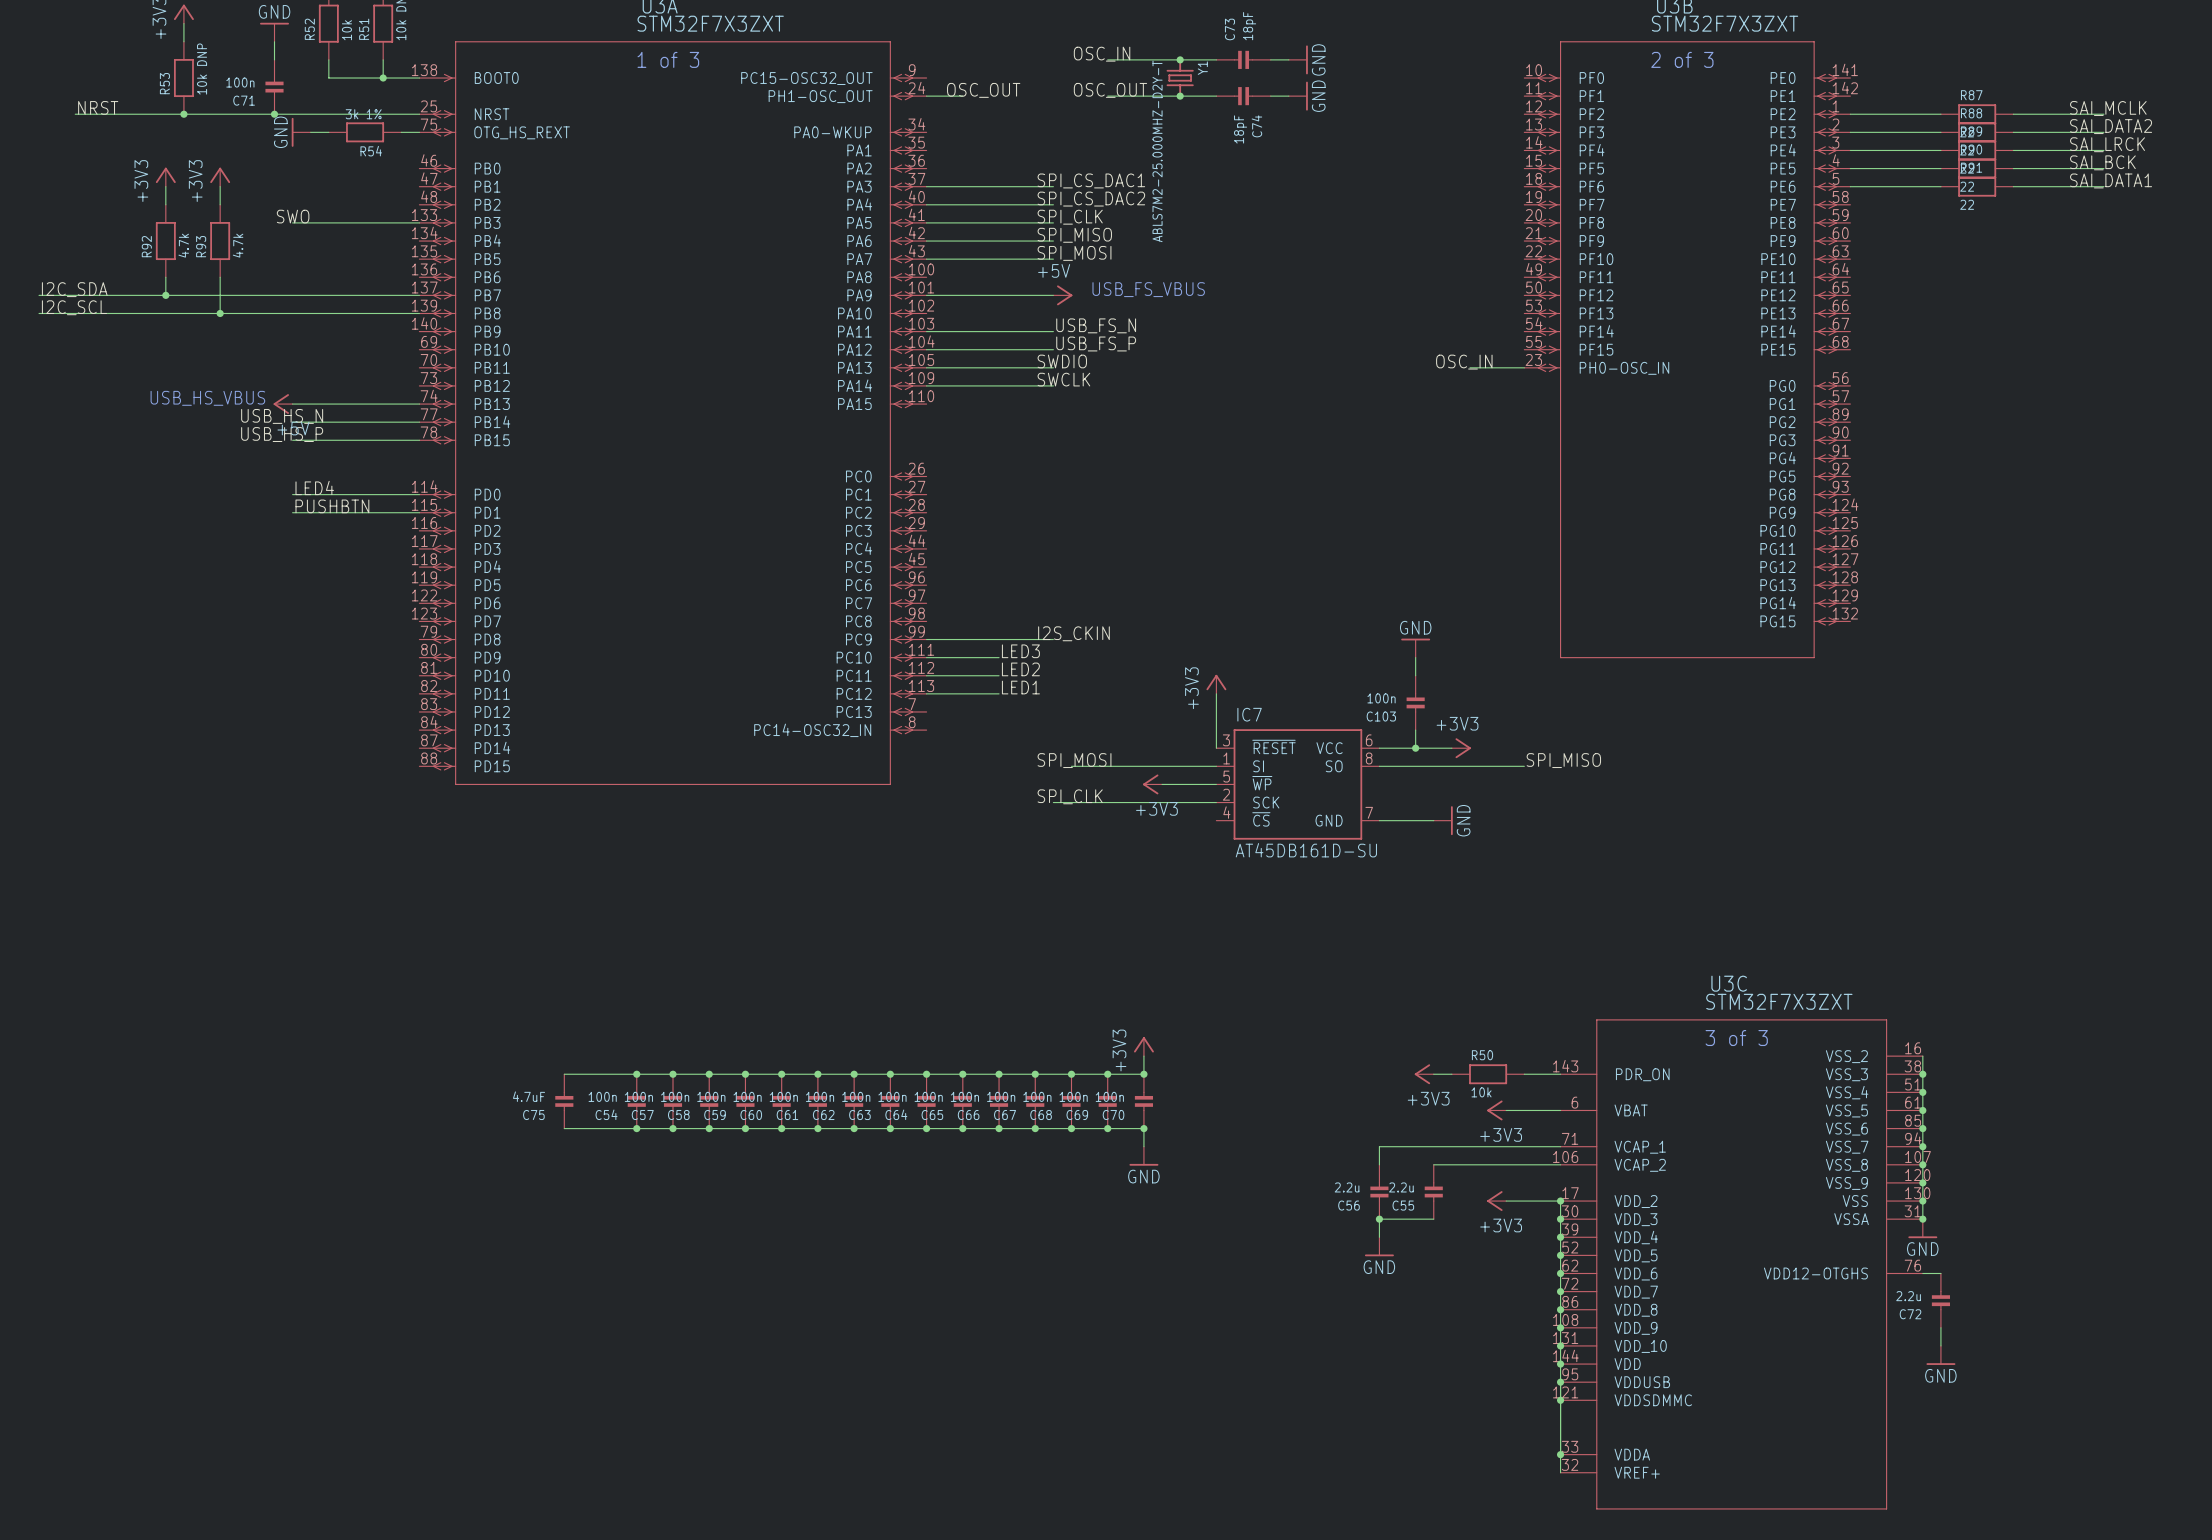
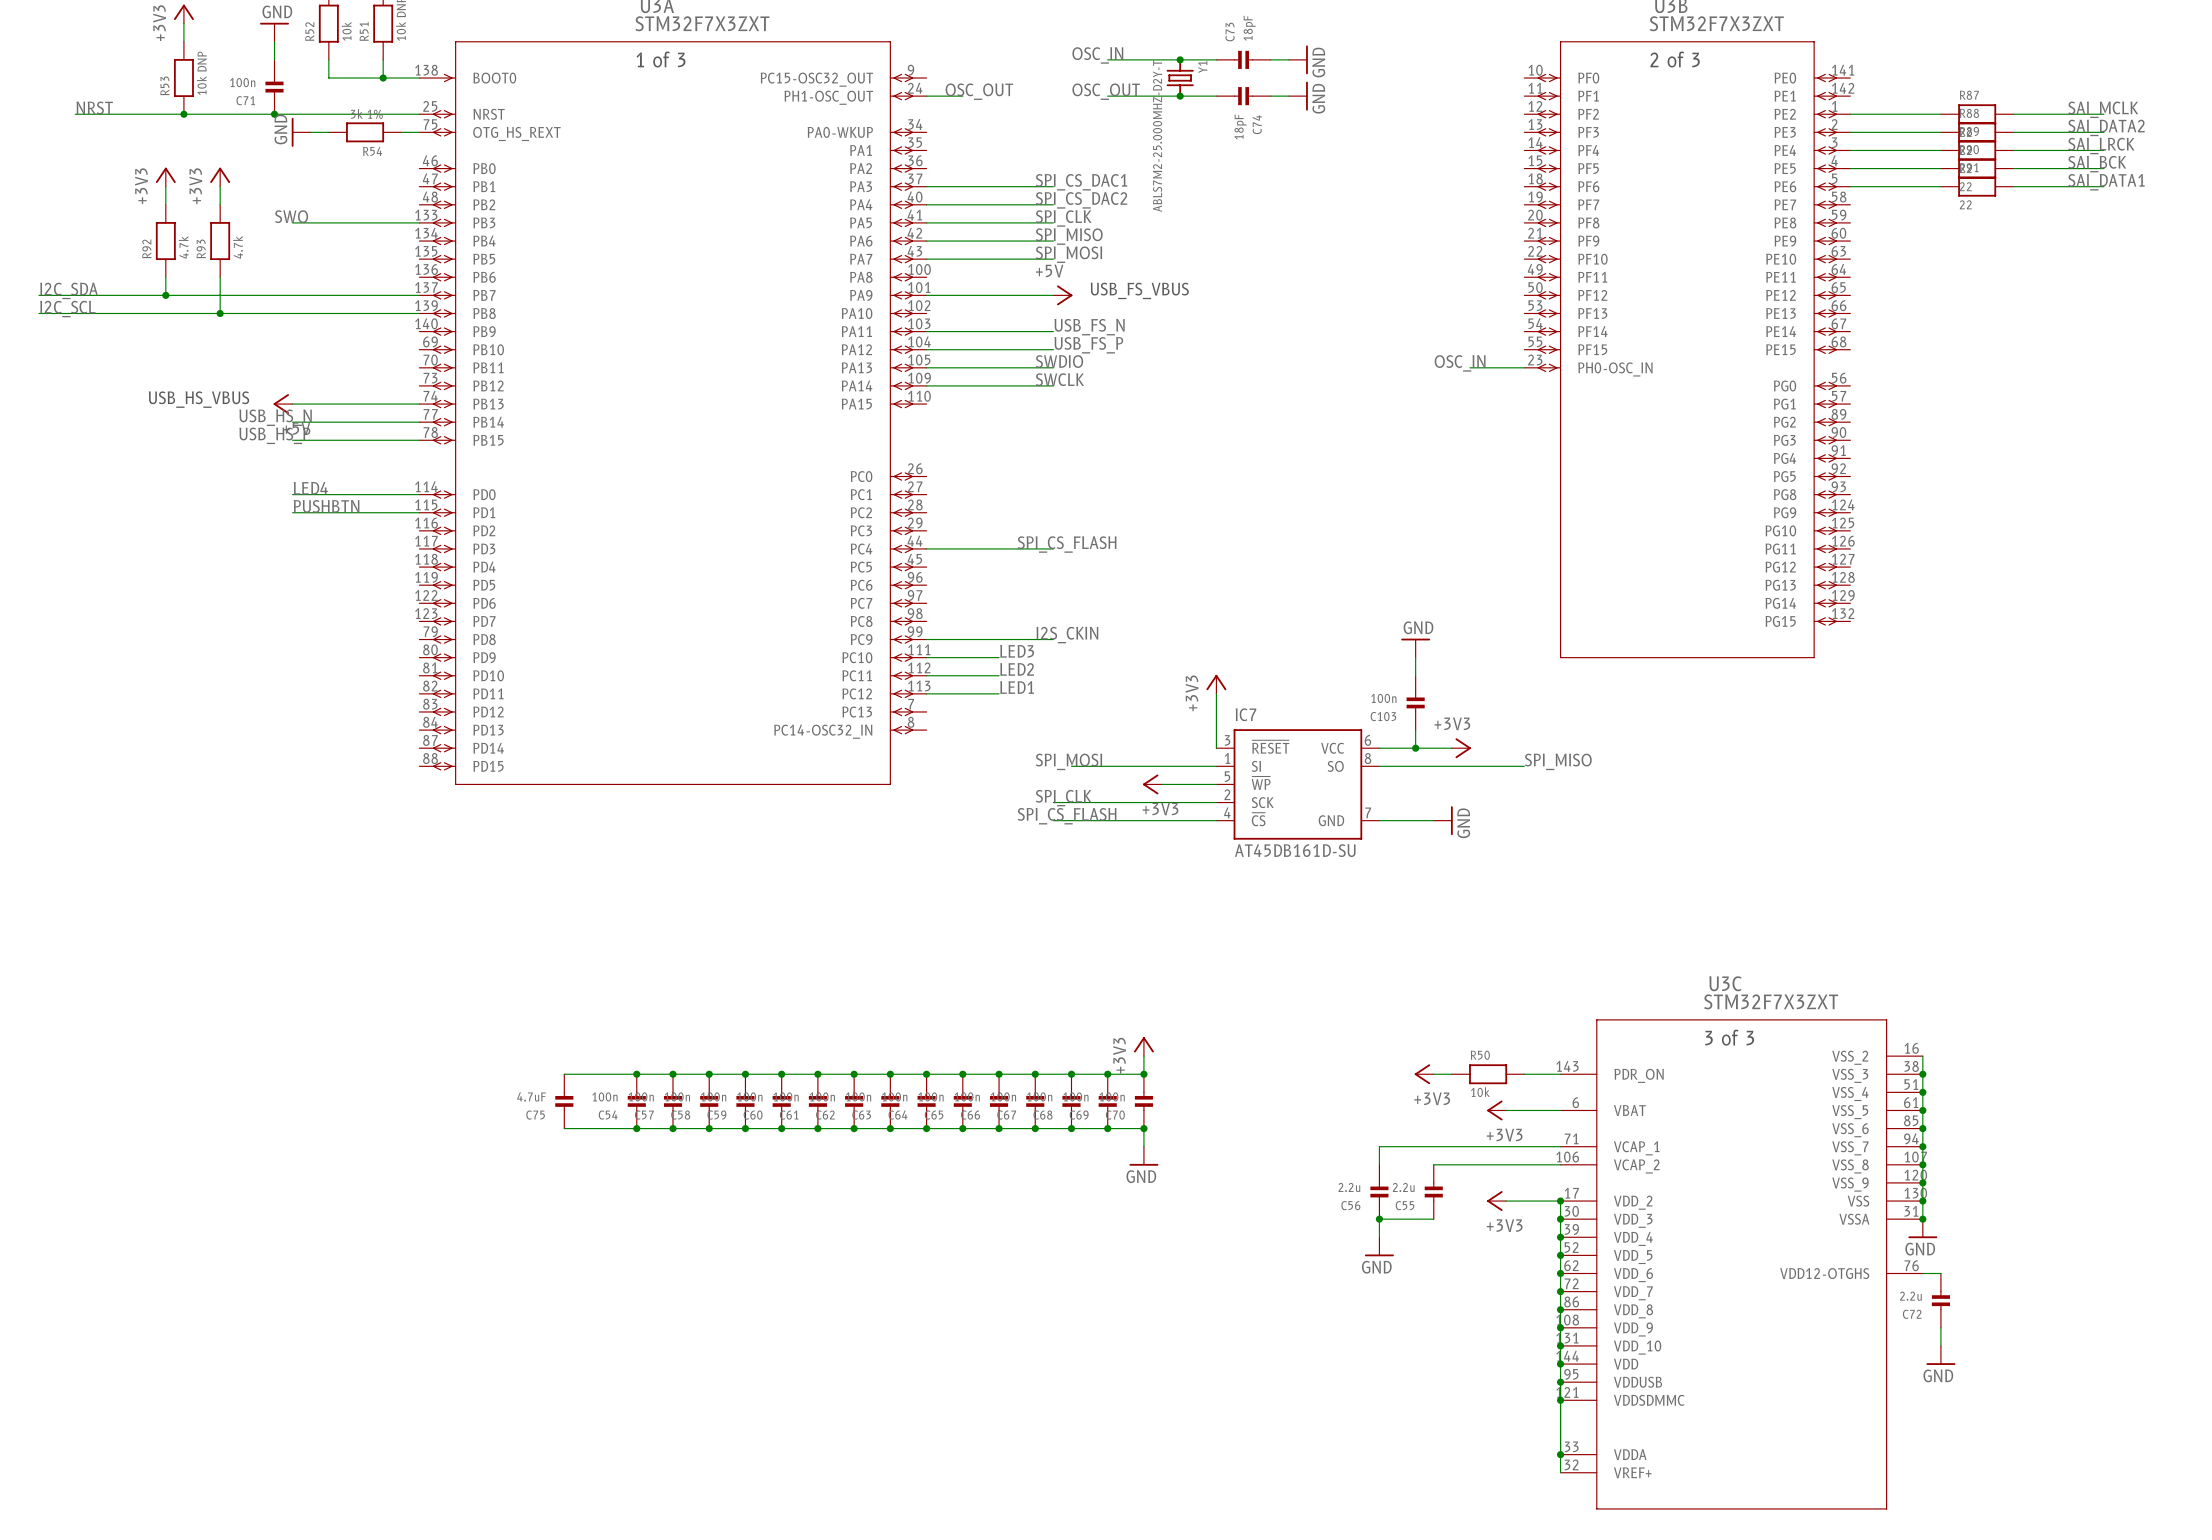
label: none -> SPI_CS_FLASH (1067, 544)
wire: none -> (926, 548) (1053, 548)
label: none -> SPI_CS_FLASH (1067, 816)
wire: none -> (1053, 820) (1216, 820)

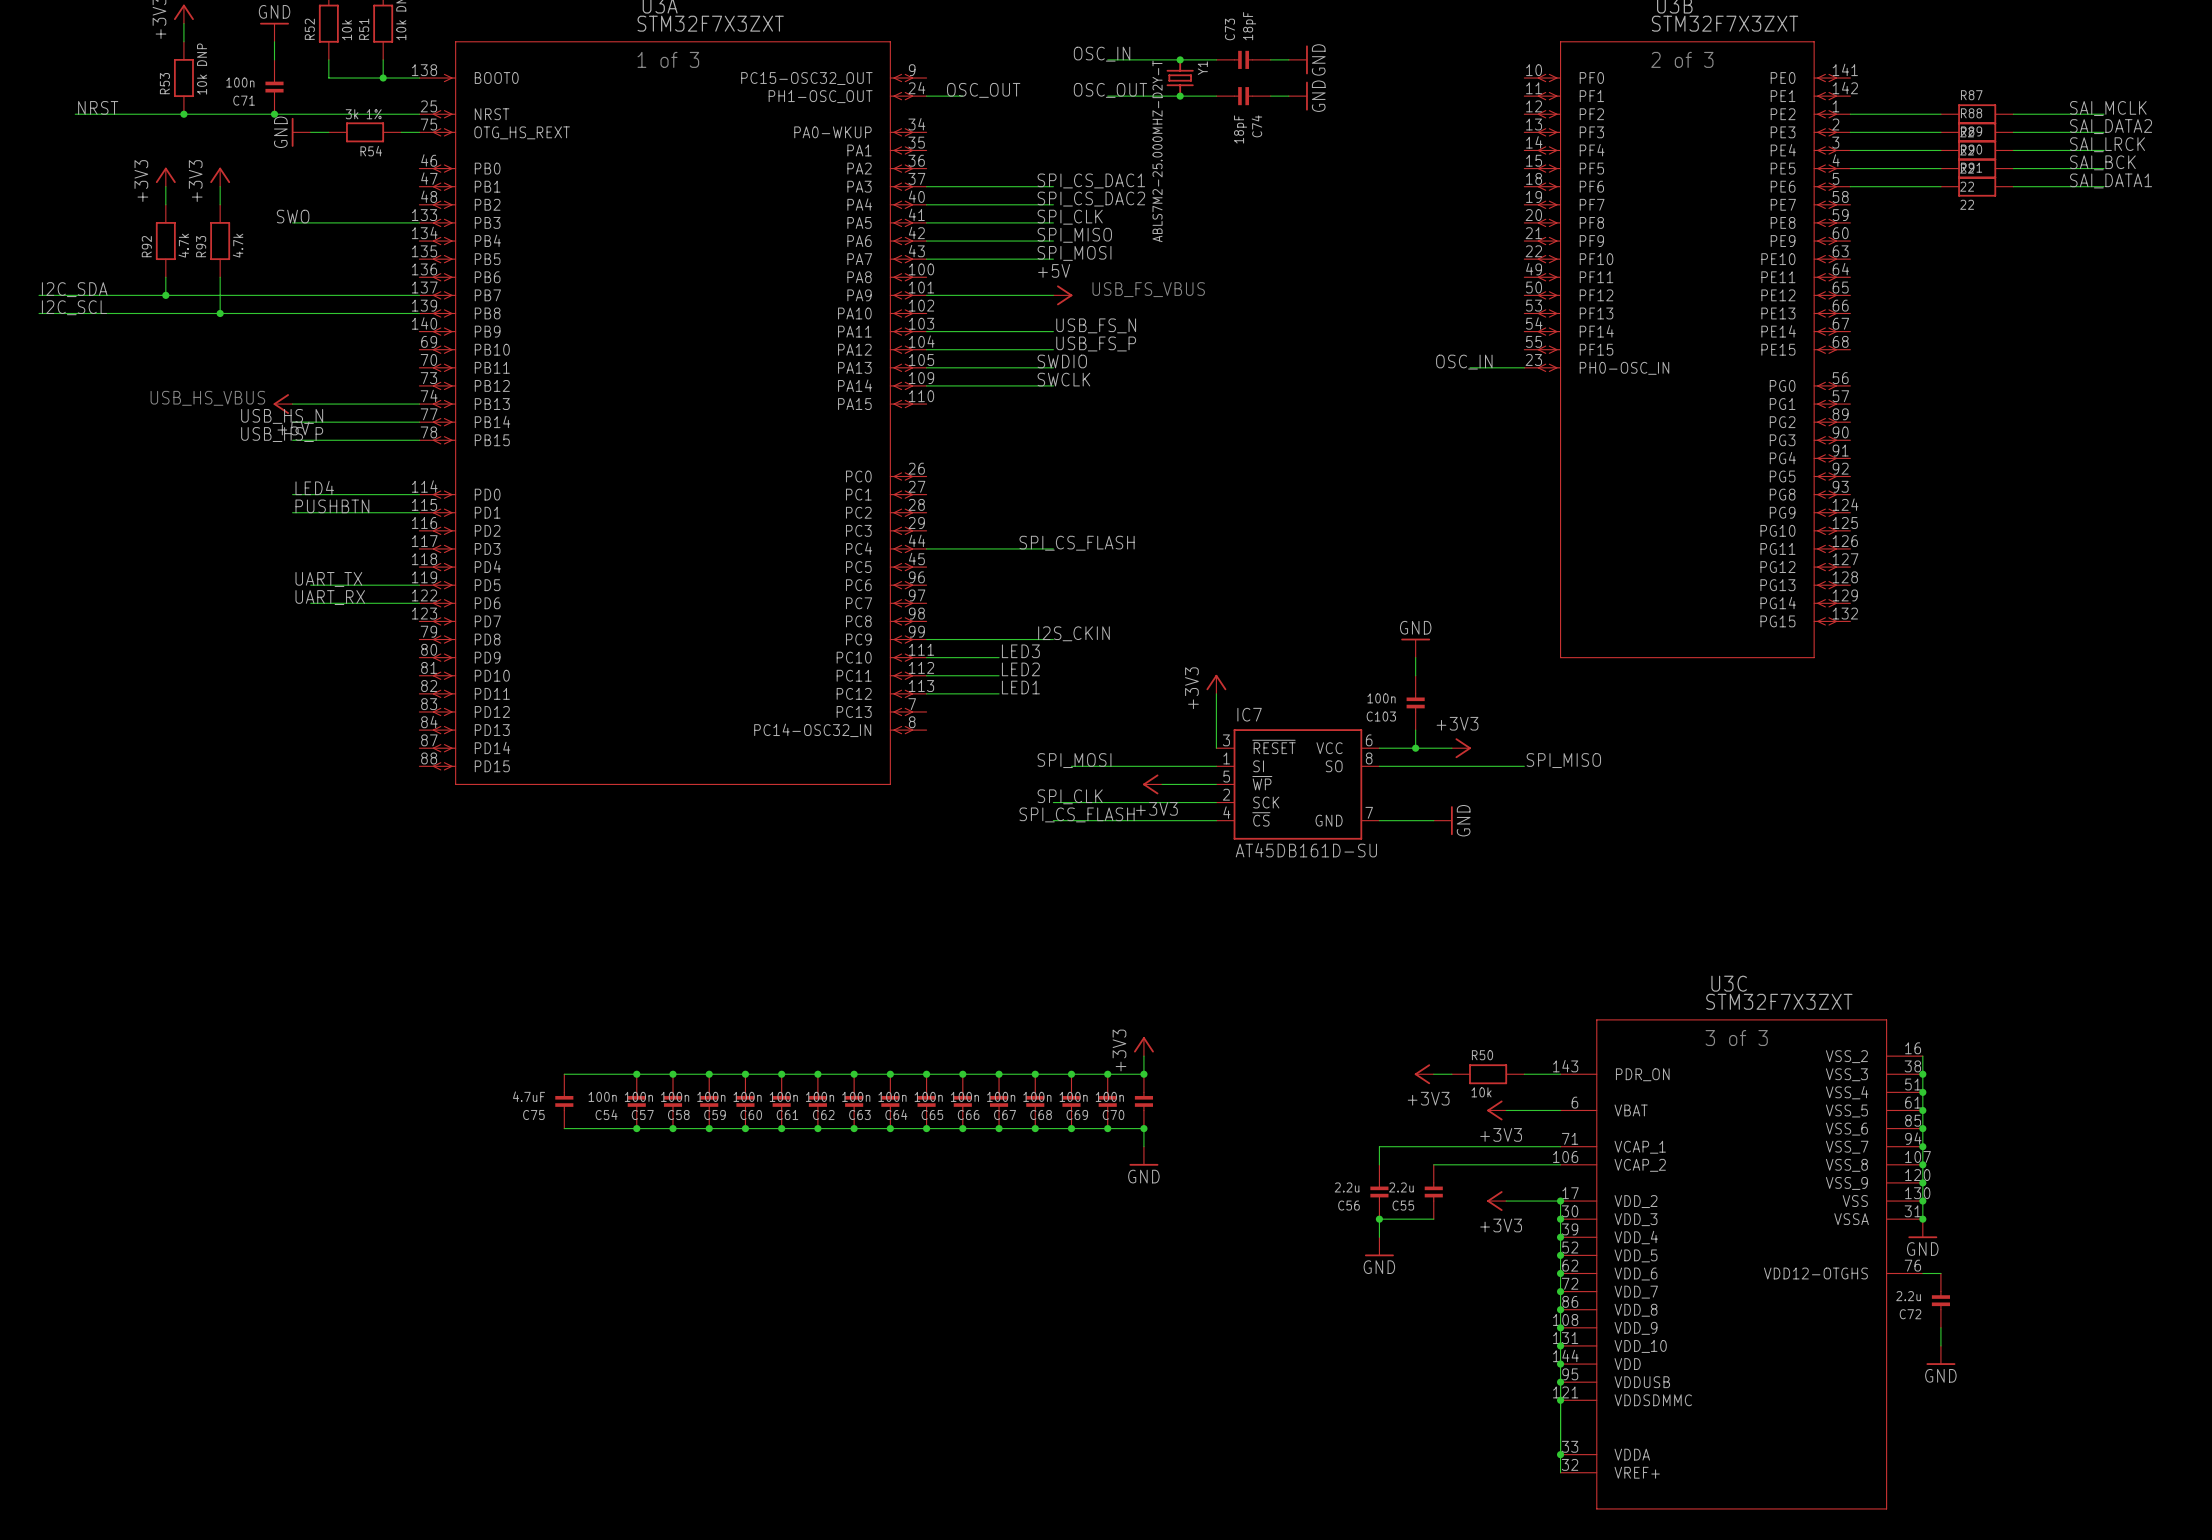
label: none -> UART_TX (328, 579)
wire: none -> (310, 585) (419, 585)
label: none -> UART_RX (330, 597)
wire: none -> (310, 603) (419, 603)

